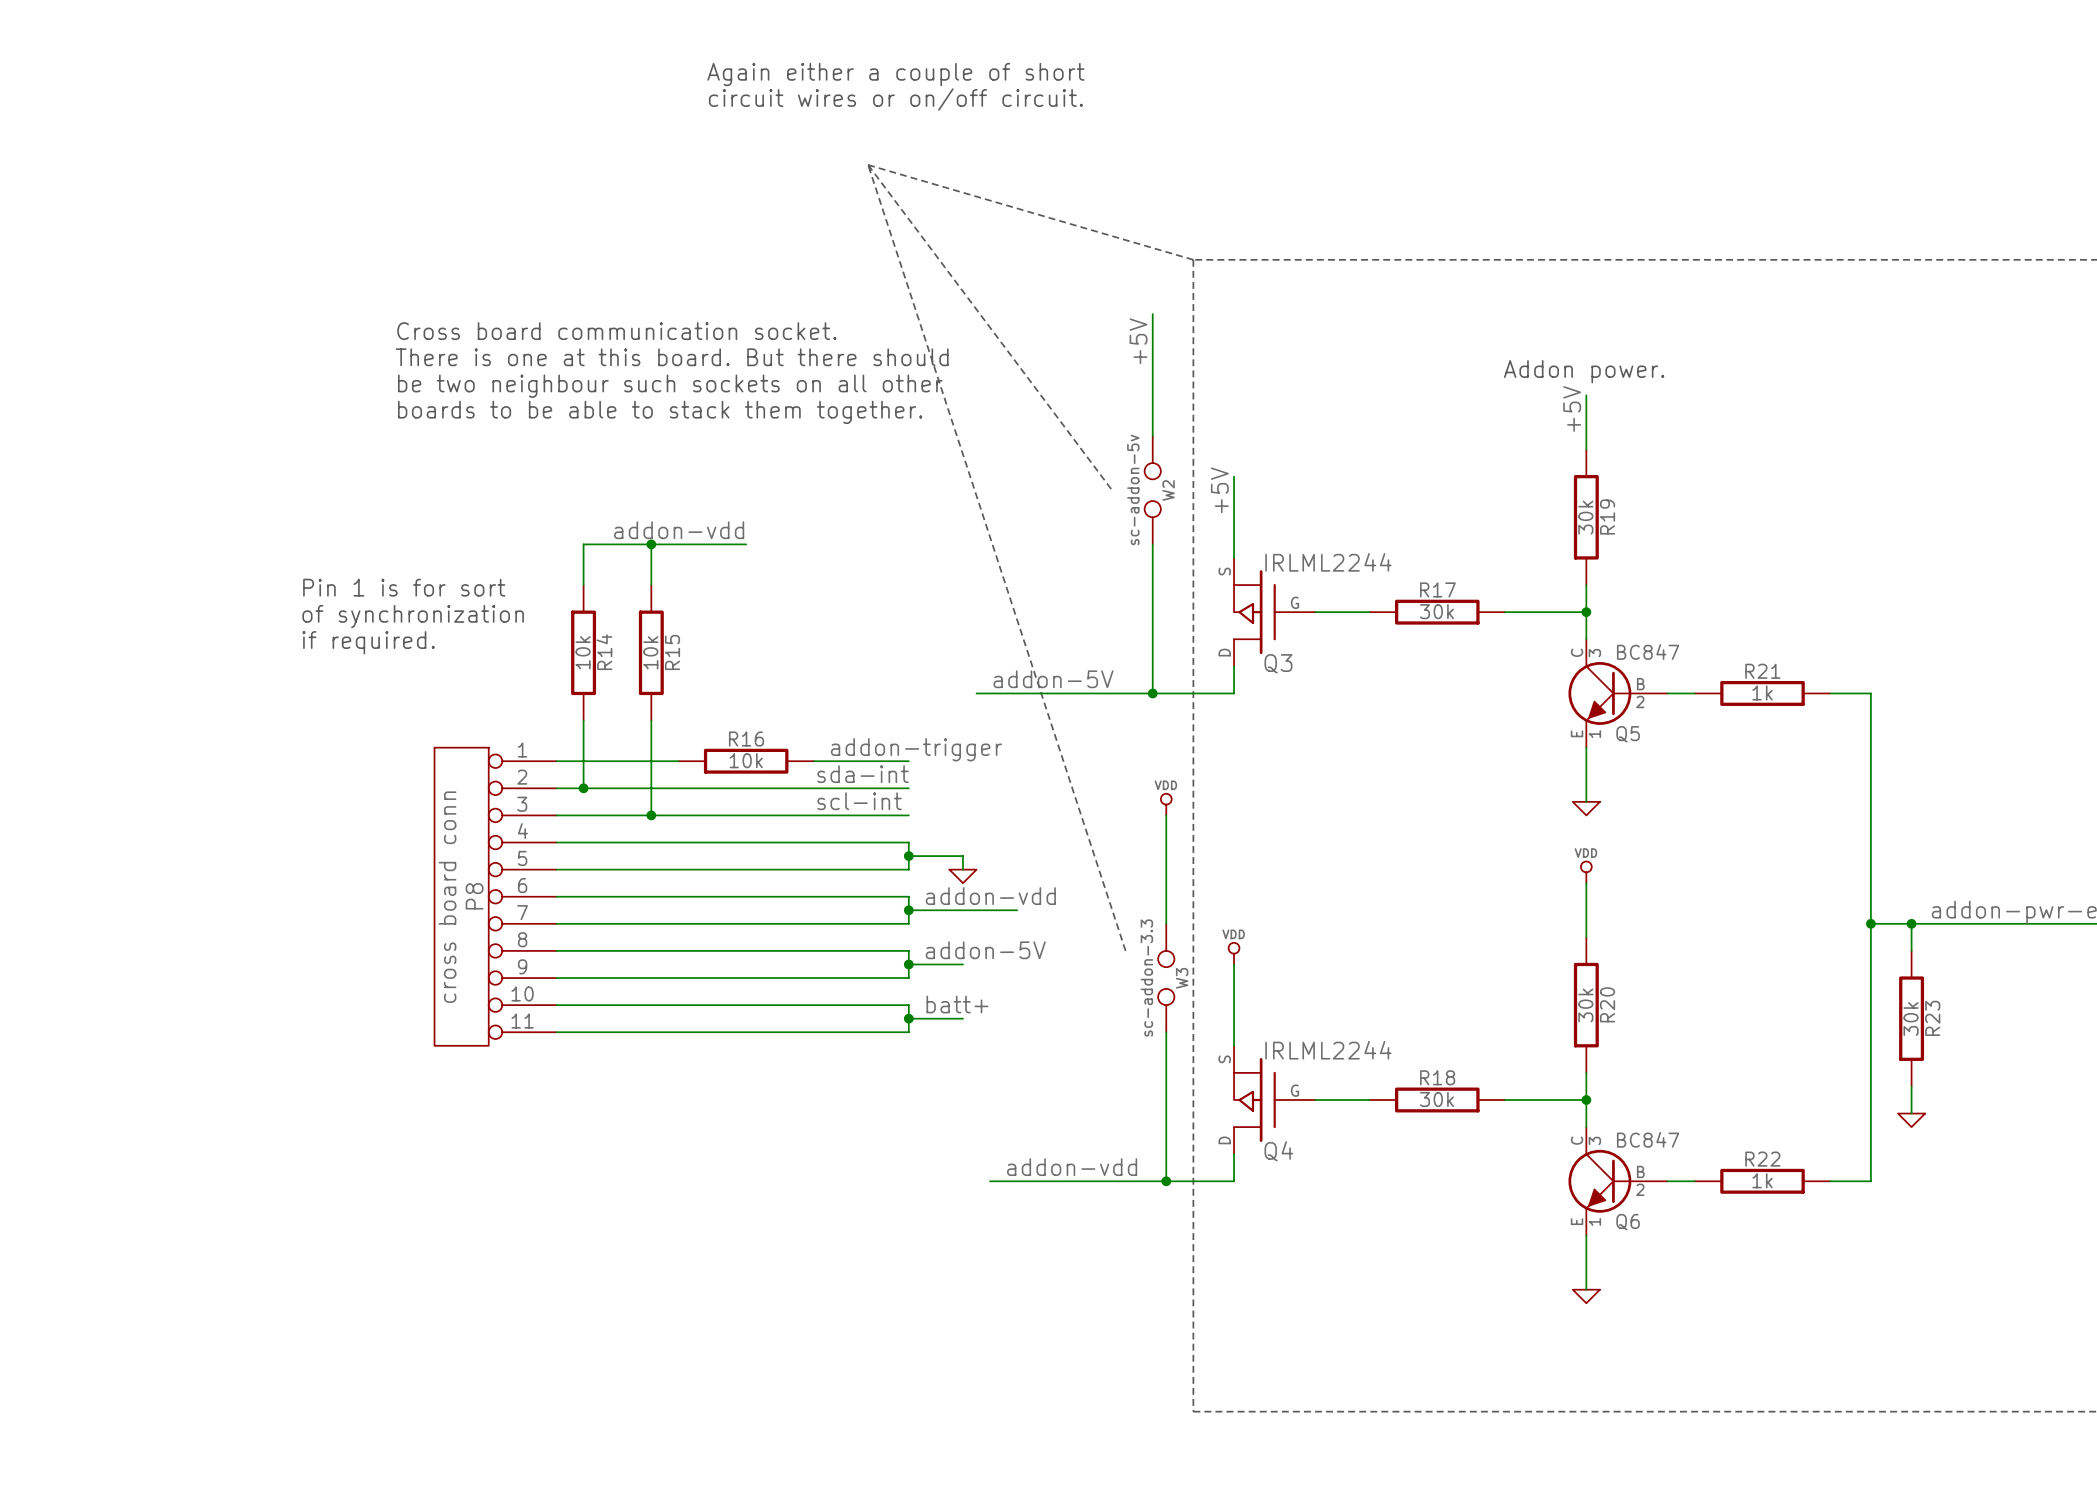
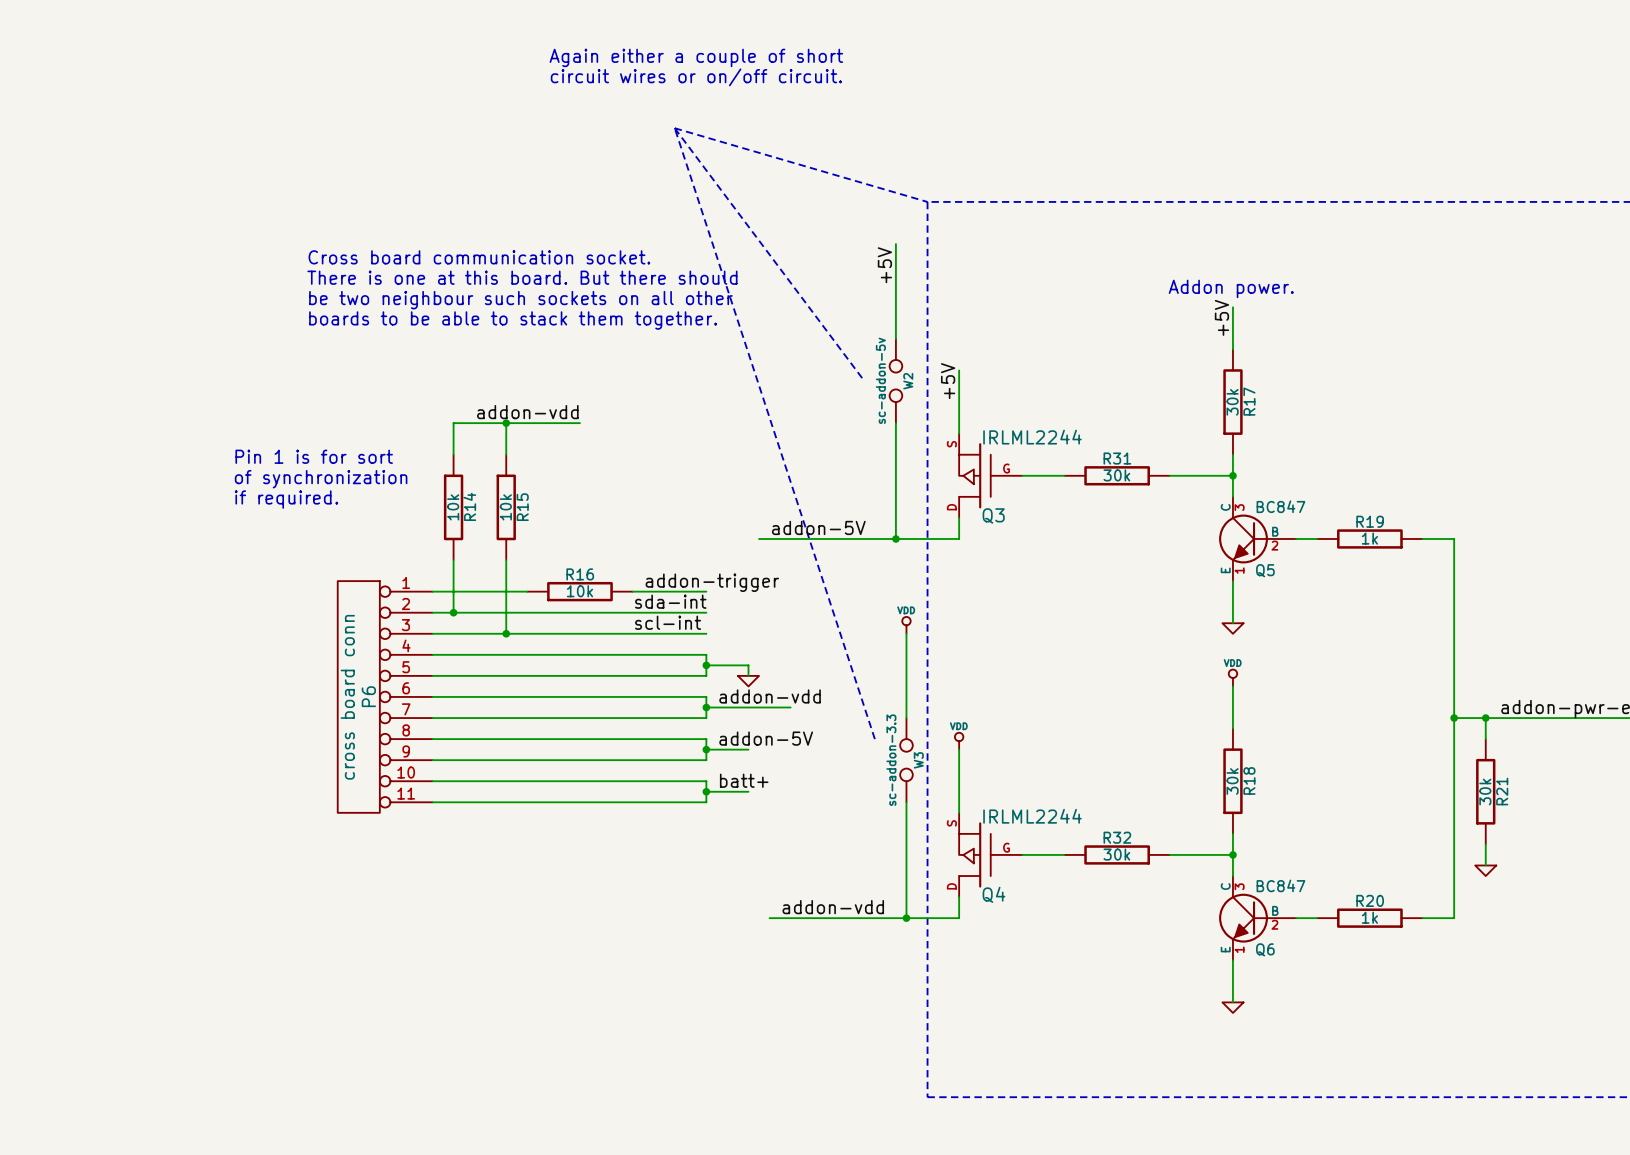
R19 name: R19 (1607, 516) -> R17 (1249, 401)
R17 name: R17 (1437, 589) -> R31 (1117, 458)
R21 name: R21 (1762, 671) -> R19 (1370, 521)
P8 name: P8 (474, 896) -> P6 (368, 696)
R20 name: R20 (1607, 1004) -> R18 (1249, 780)
R23 name: R23 (1932, 1018) -> R21 (1502, 791)
R18 name: R18 (1437, 1077) -> R32 (1117, 837)
R22 name: R22 (1762, 1159) -> R20 (1370, 900)

